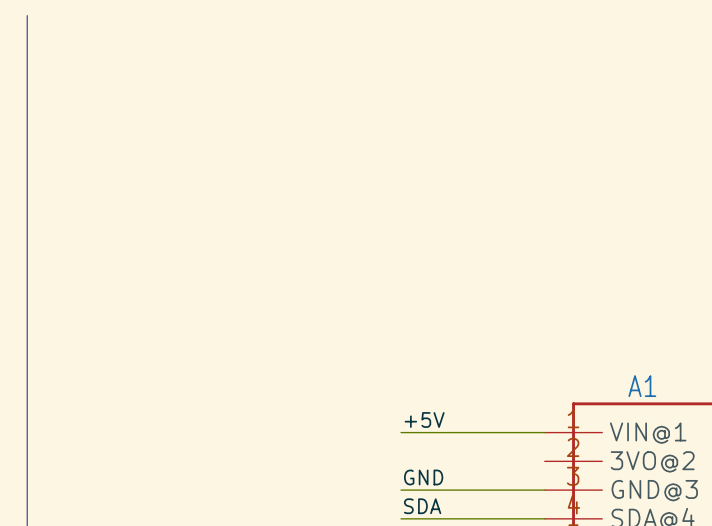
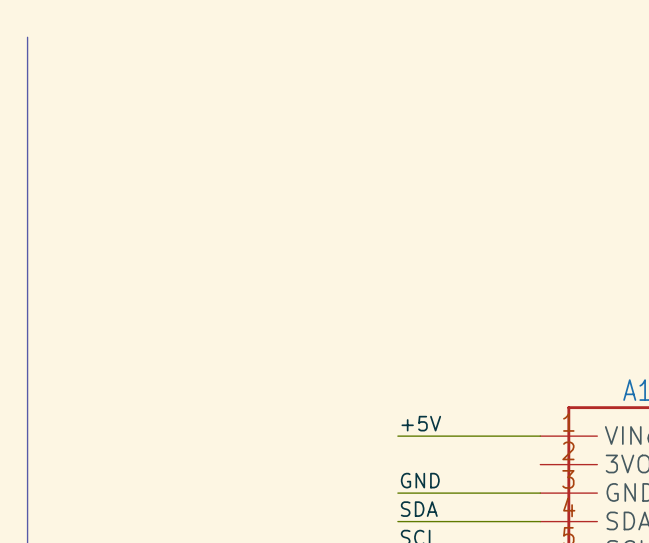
line: (27, 15) (27, 30) -> none

